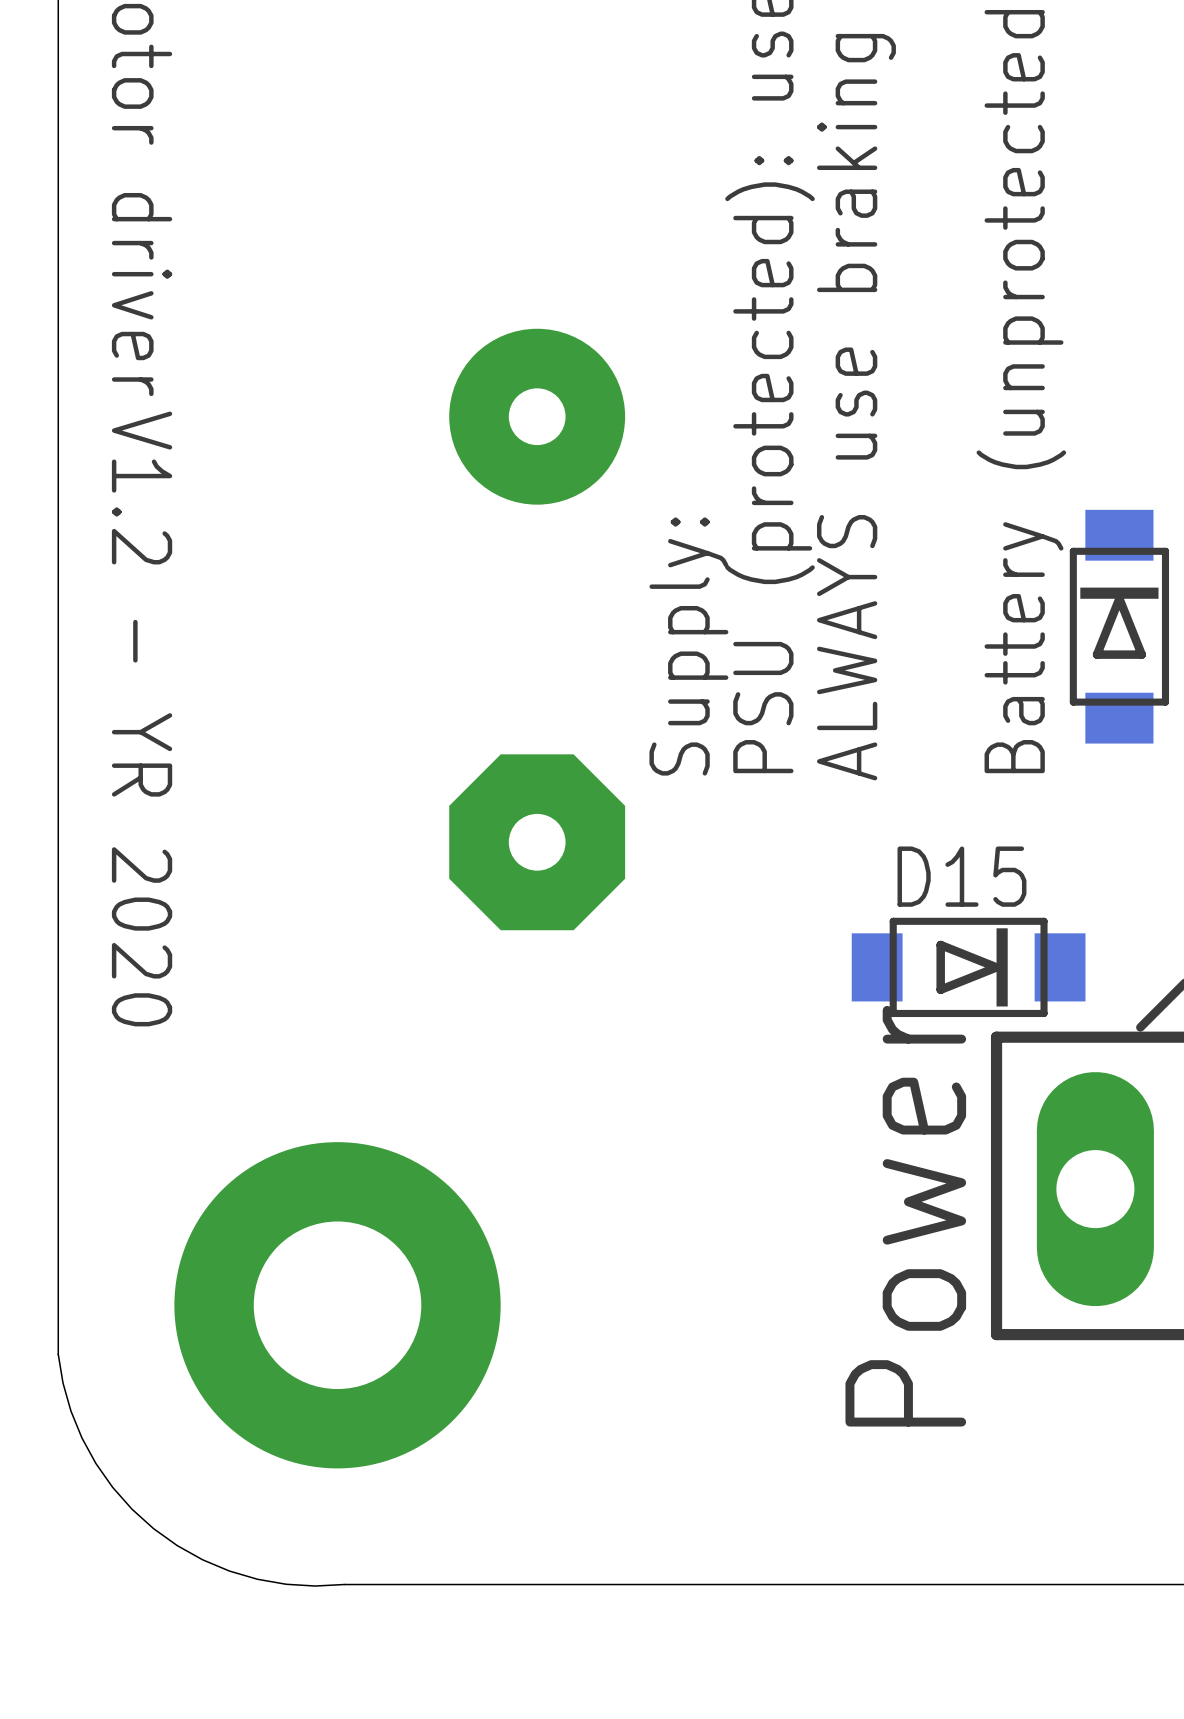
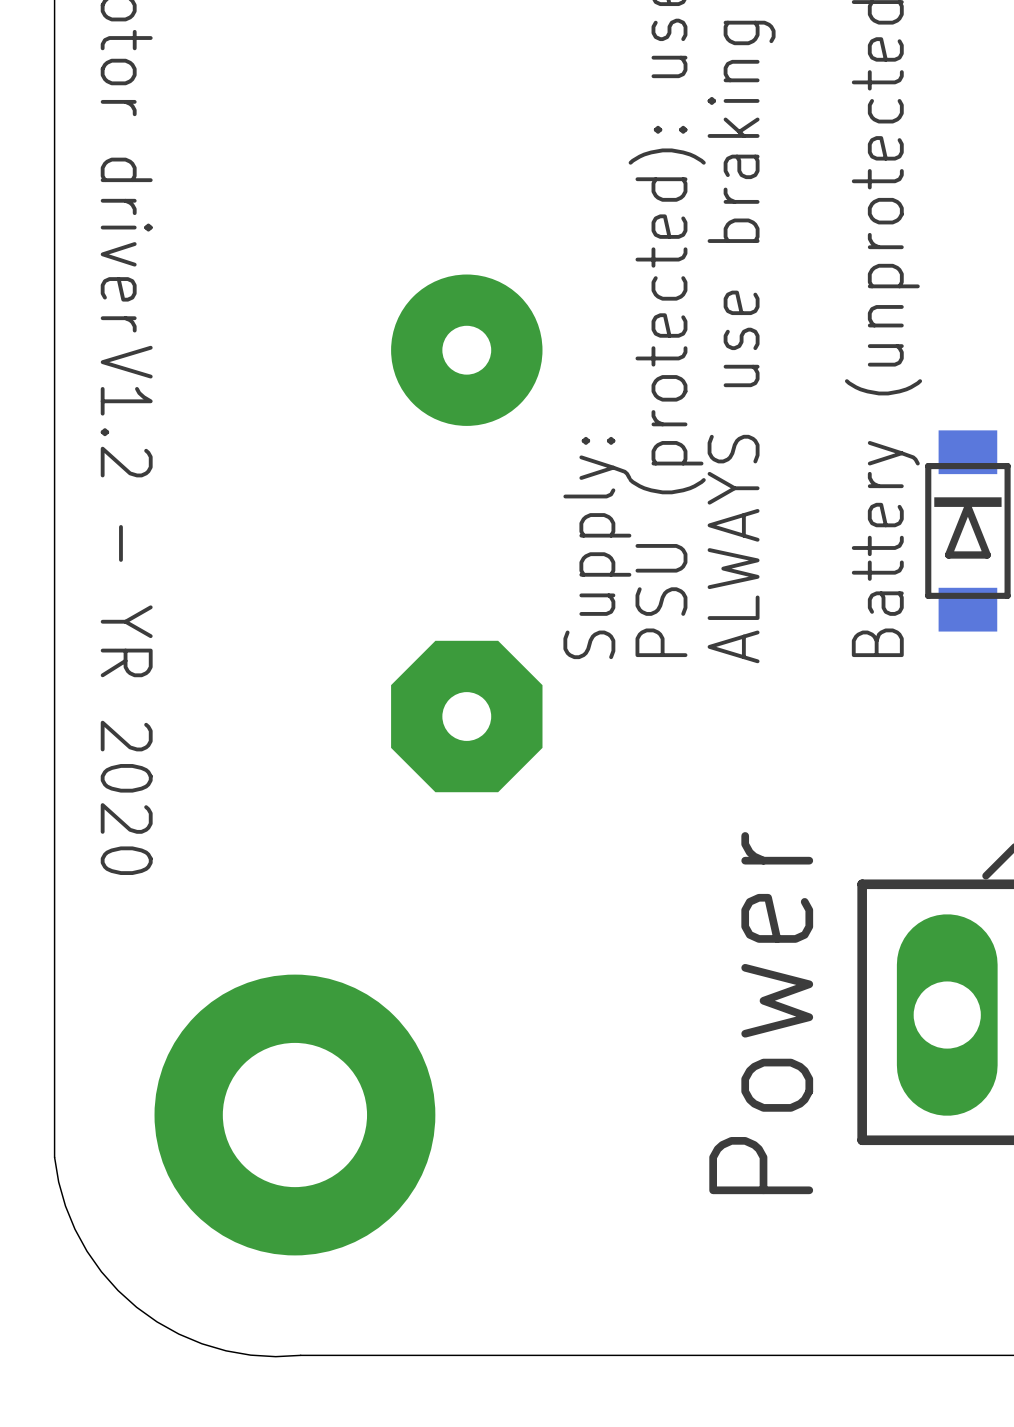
D15: (968, 967) -> none
text position: Power (905, 1216) -> Power (761, 1013)

